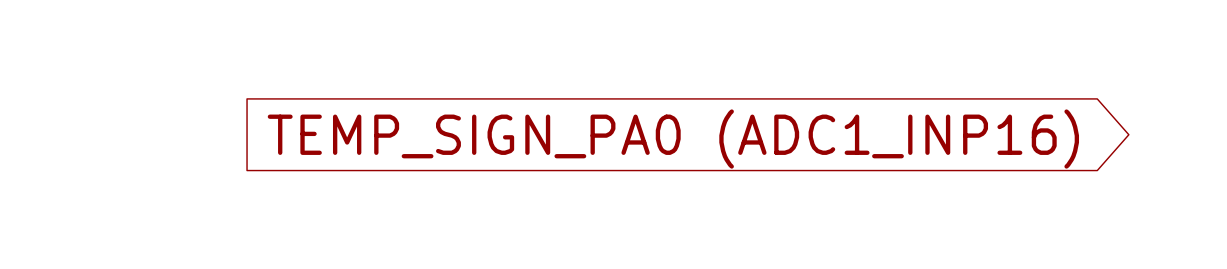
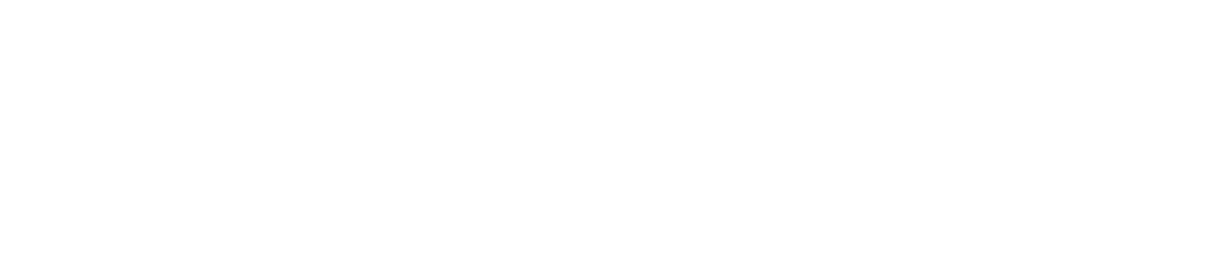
global label: TEMP_SIGN_PA0 (ADC1_INP16) (673, 139) -> none

